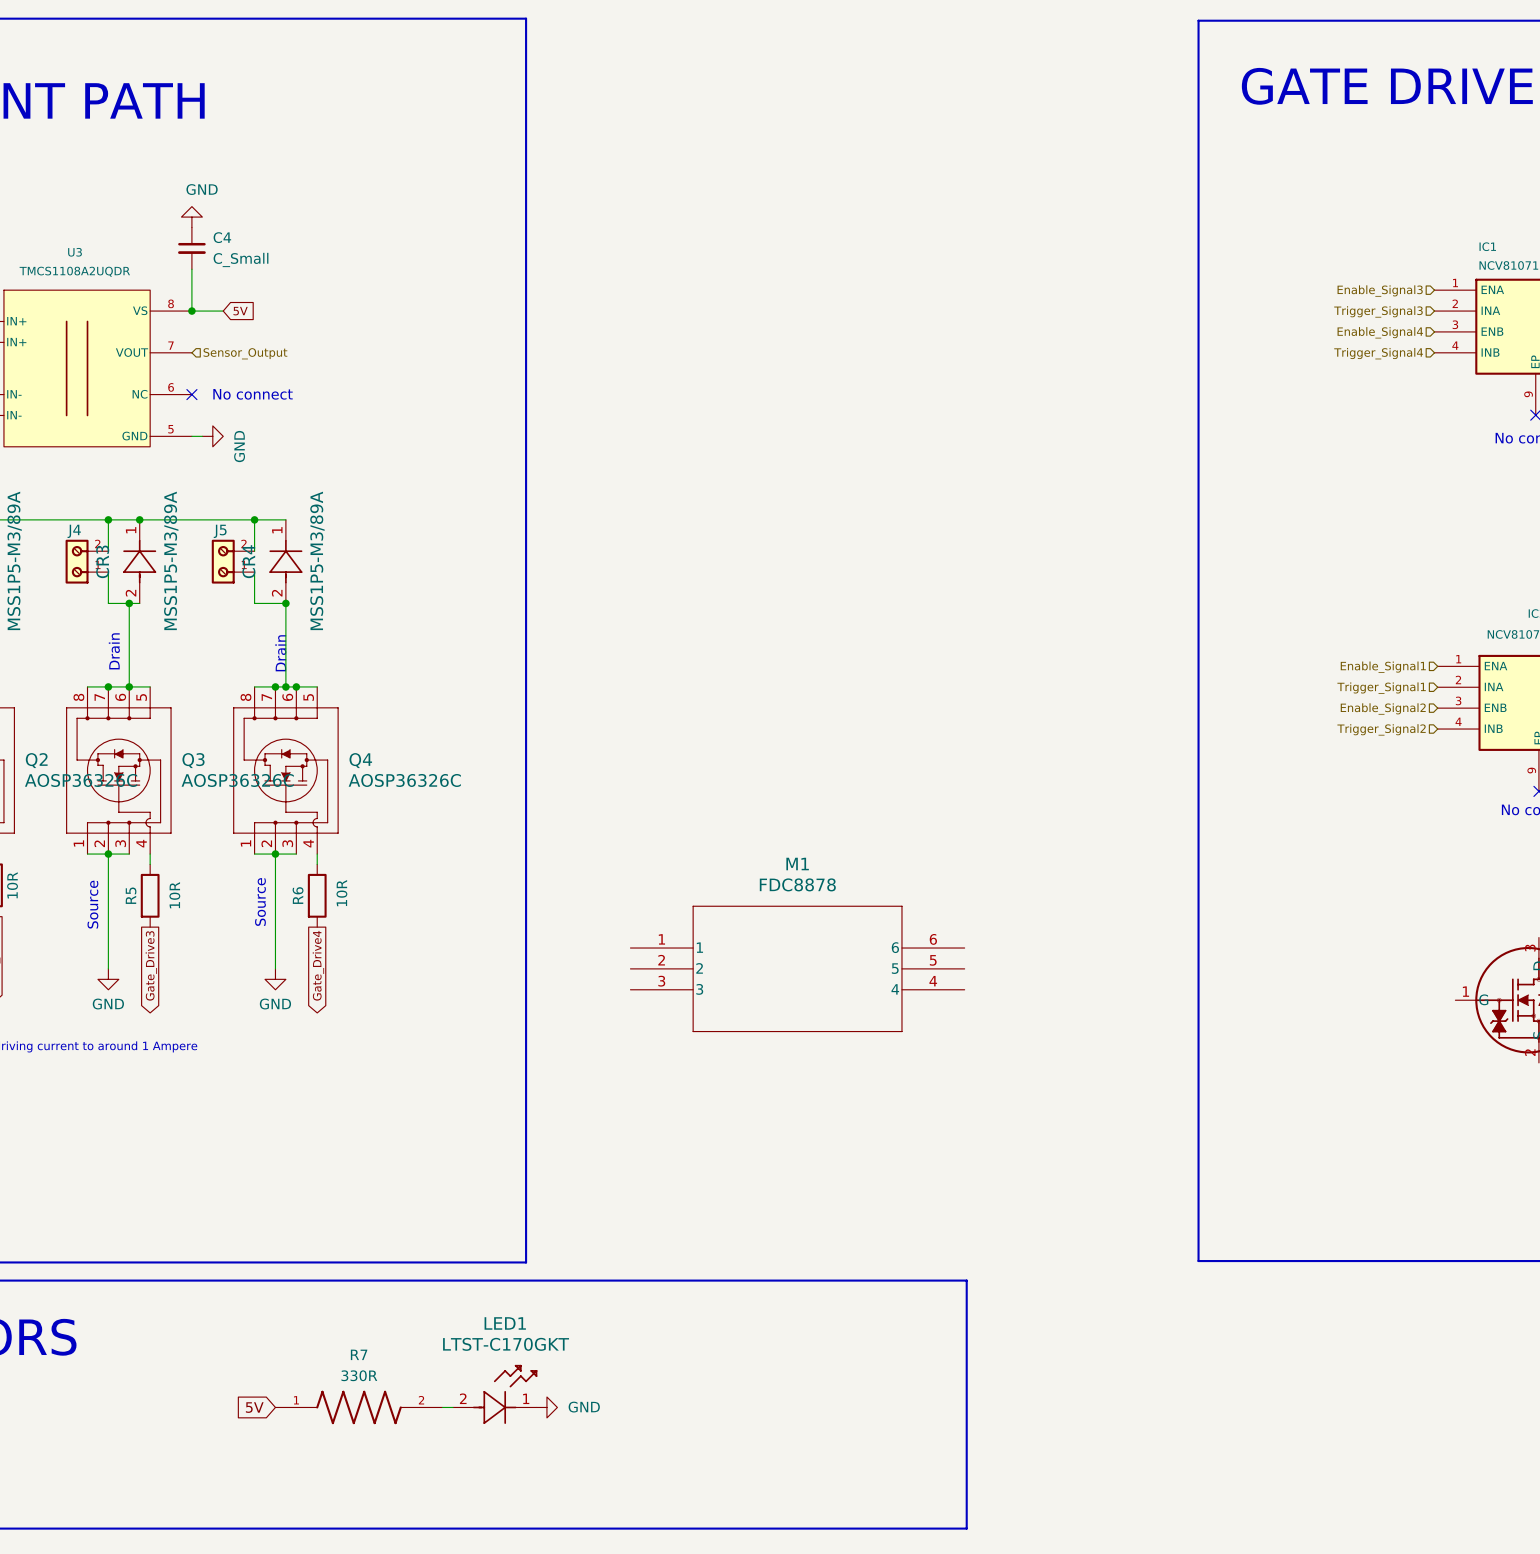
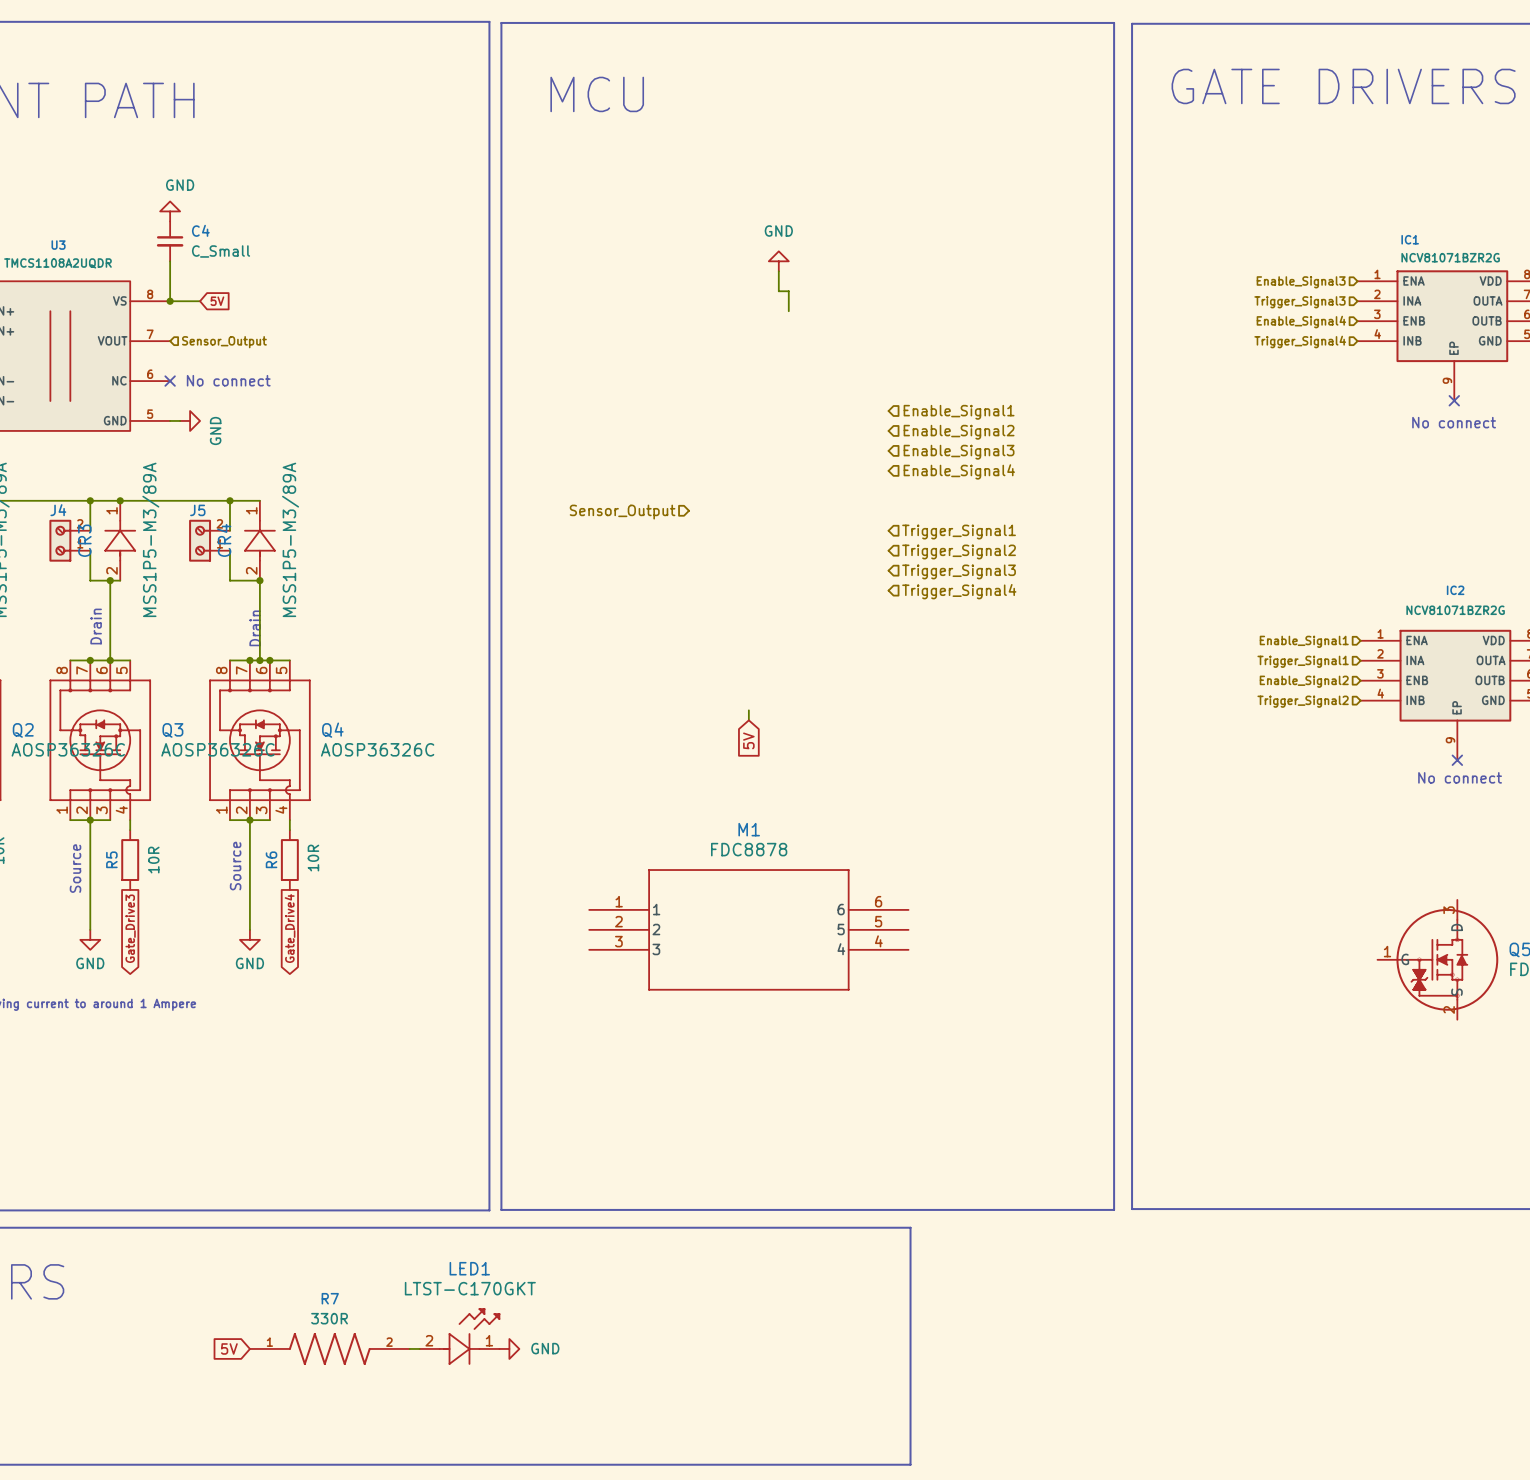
line: none -> (501, 22) (1114, 22) (1114, 1209) (501, 1209) (501, 22)
text: none -> MCU (597, 94)
power symbol: none -> GND (778, 261)
wire: none -> (778, 271) (778, 291) (788, 291) (788, 311)
hierarchical label: none -> Enable_Signal1 (959, 412)
hierarchical label: none -> Enable_Signal2 (959, 432)
hierarchical label: none -> Enable_Signal3 (959, 452)
hierarchical label: none -> Enable_Signal4 (959, 471)
hierarchical label: none -> Sensor_Output (622, 512)
hierarchical label: none -> Trigger_Signal1 (959, 532)
hierarchical label: none -> Trigger_Signal2 (959, 551)
hierarchical label: none -> Trigger_Signal3 (959, 571)
hierarchical label: none -> Trigger_Signal4 (959, 591)
wire: none -> (748, 710) (748, 720)
global label: none -> 5V (748, 740)

